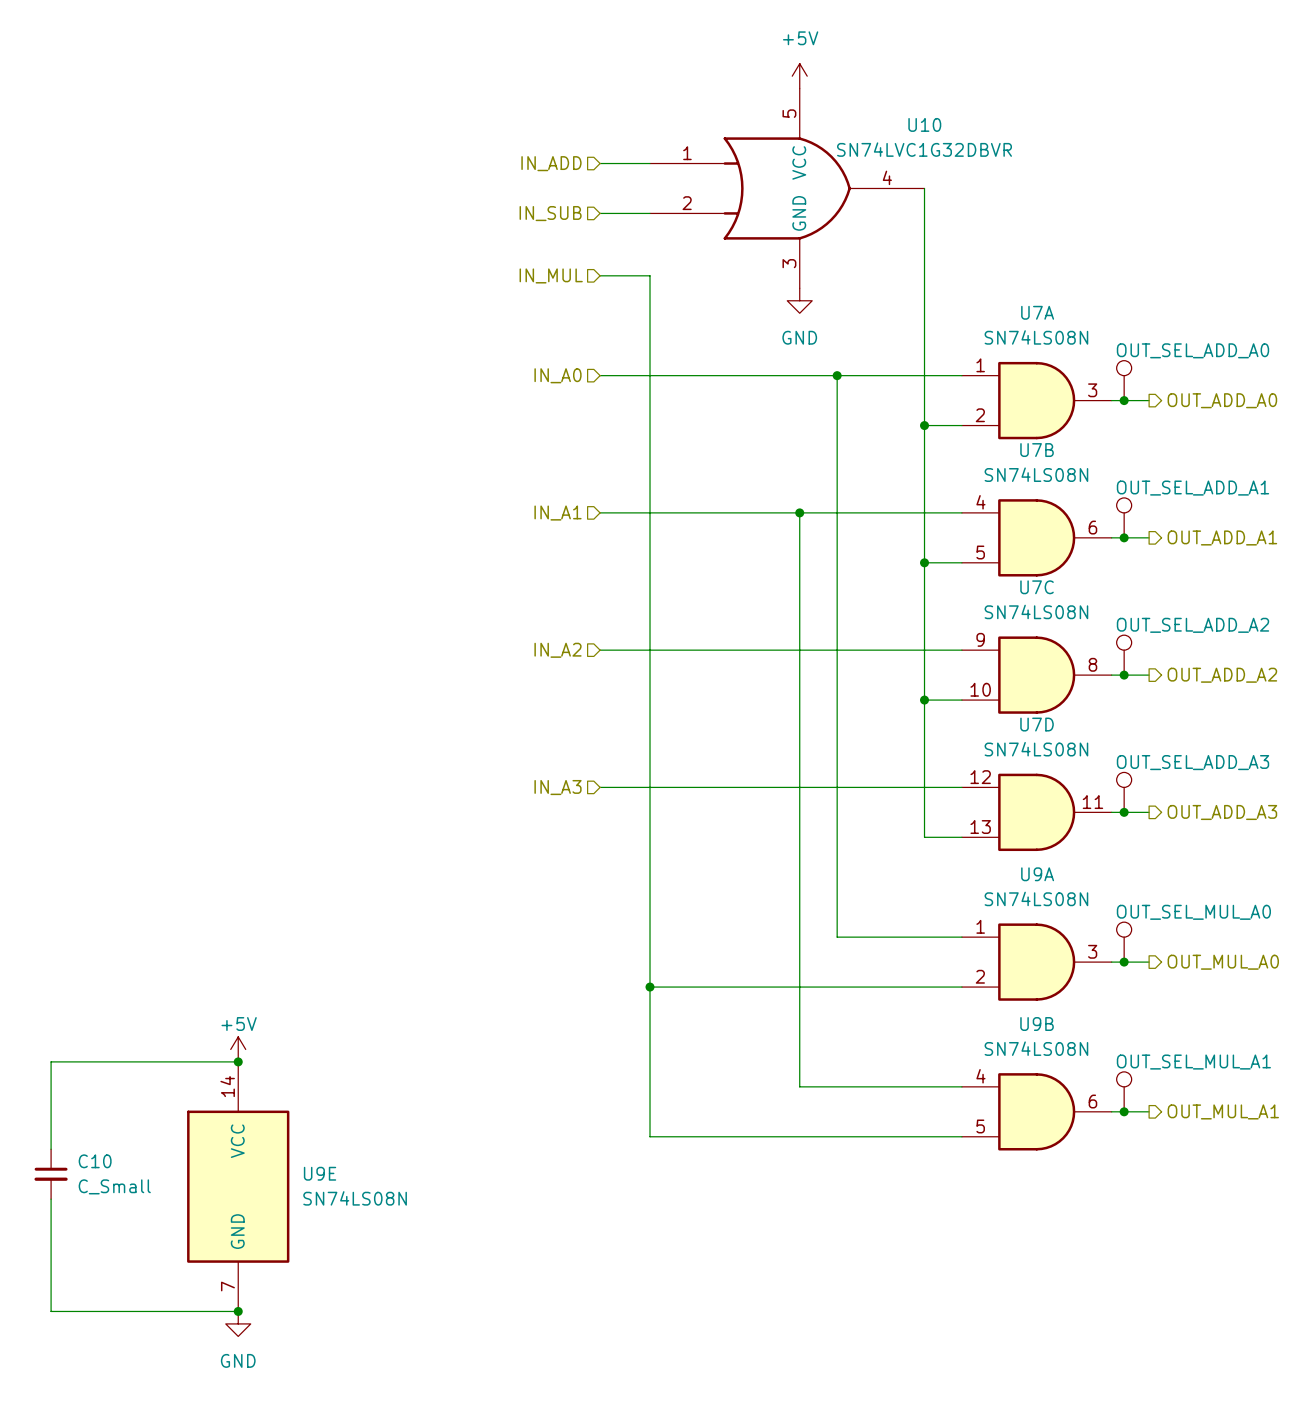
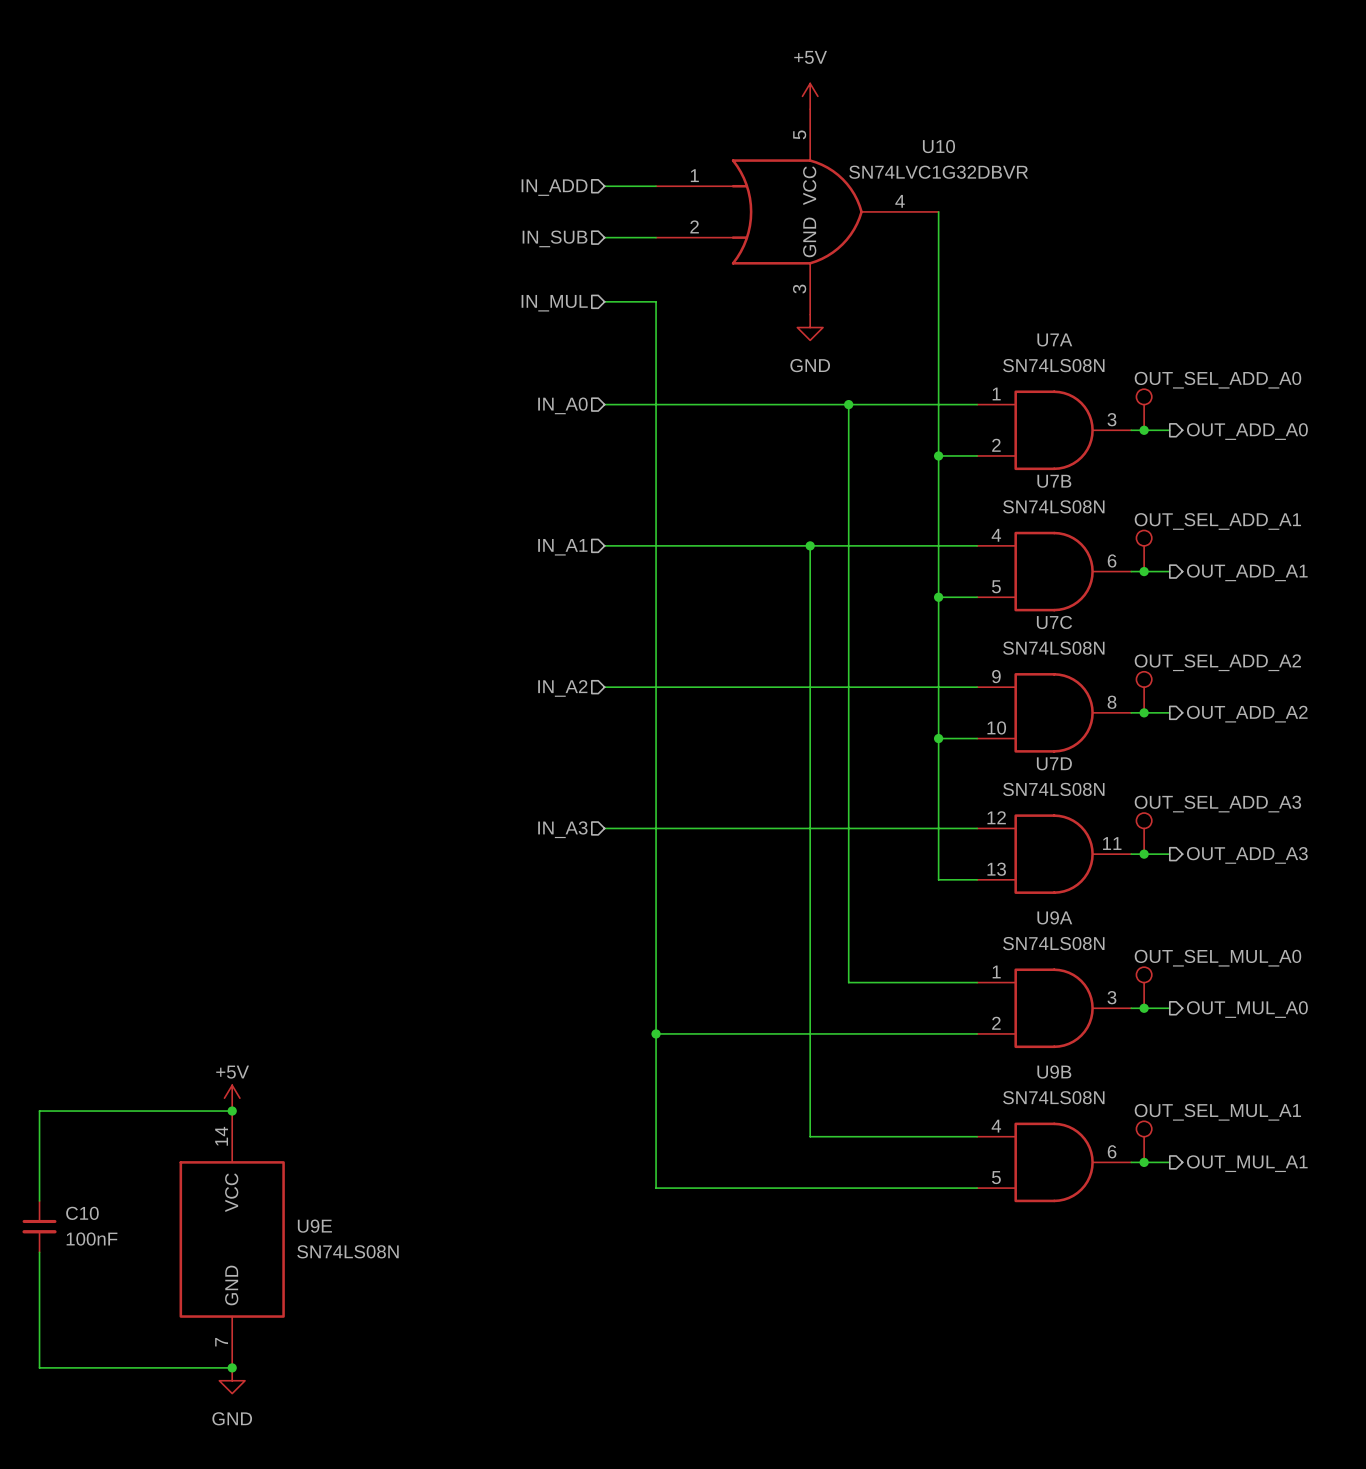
C10 value: C_Small (114, 1186) -> 100nF (92, 1239)

